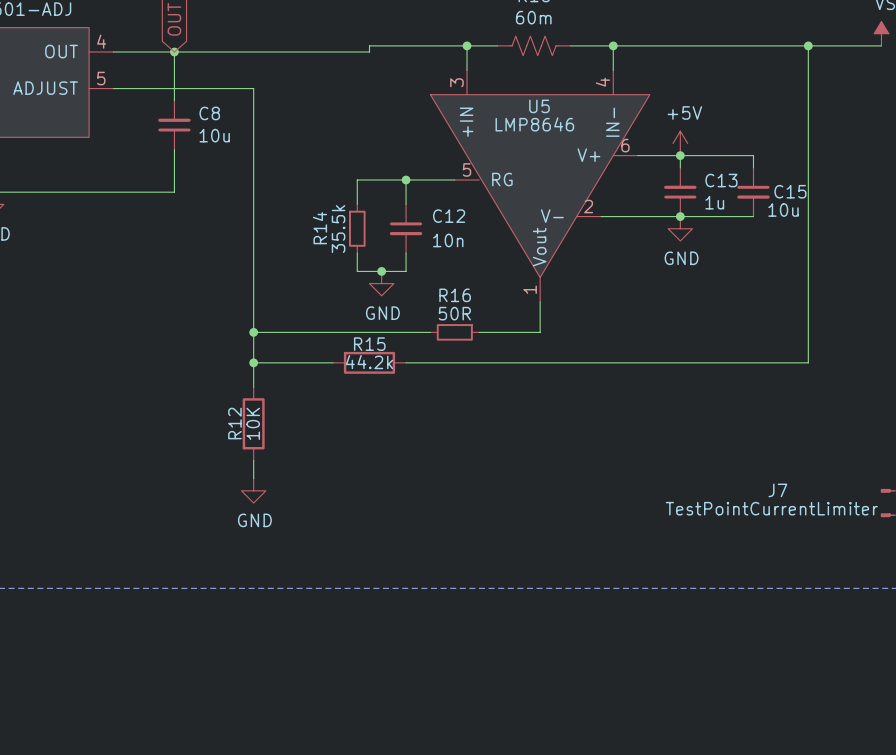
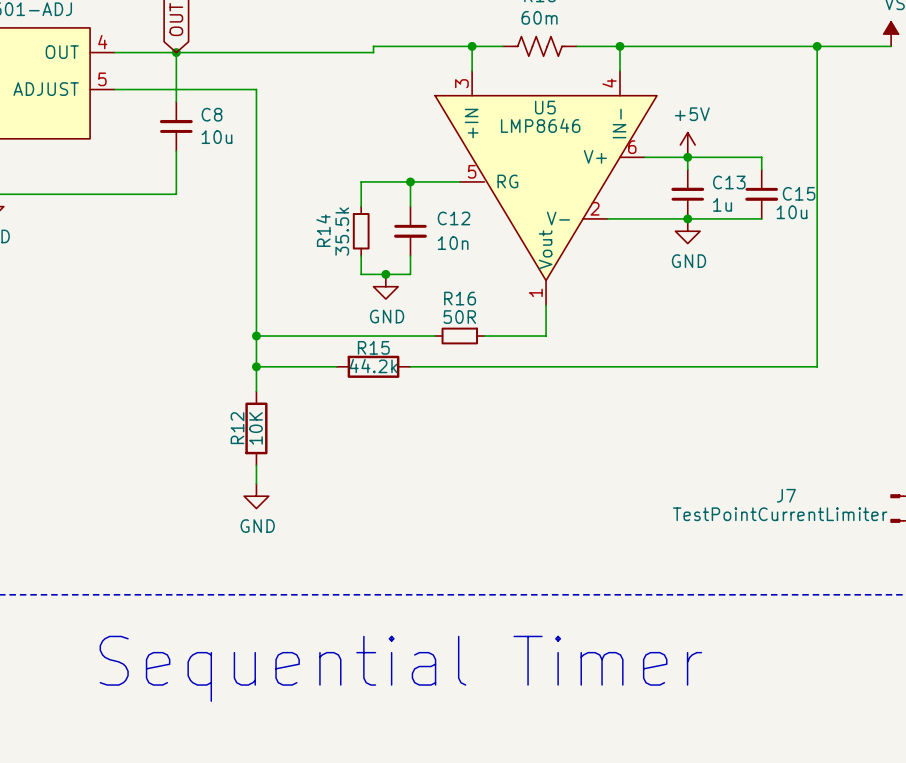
text: none -> Sequential Timer (400, 668)

